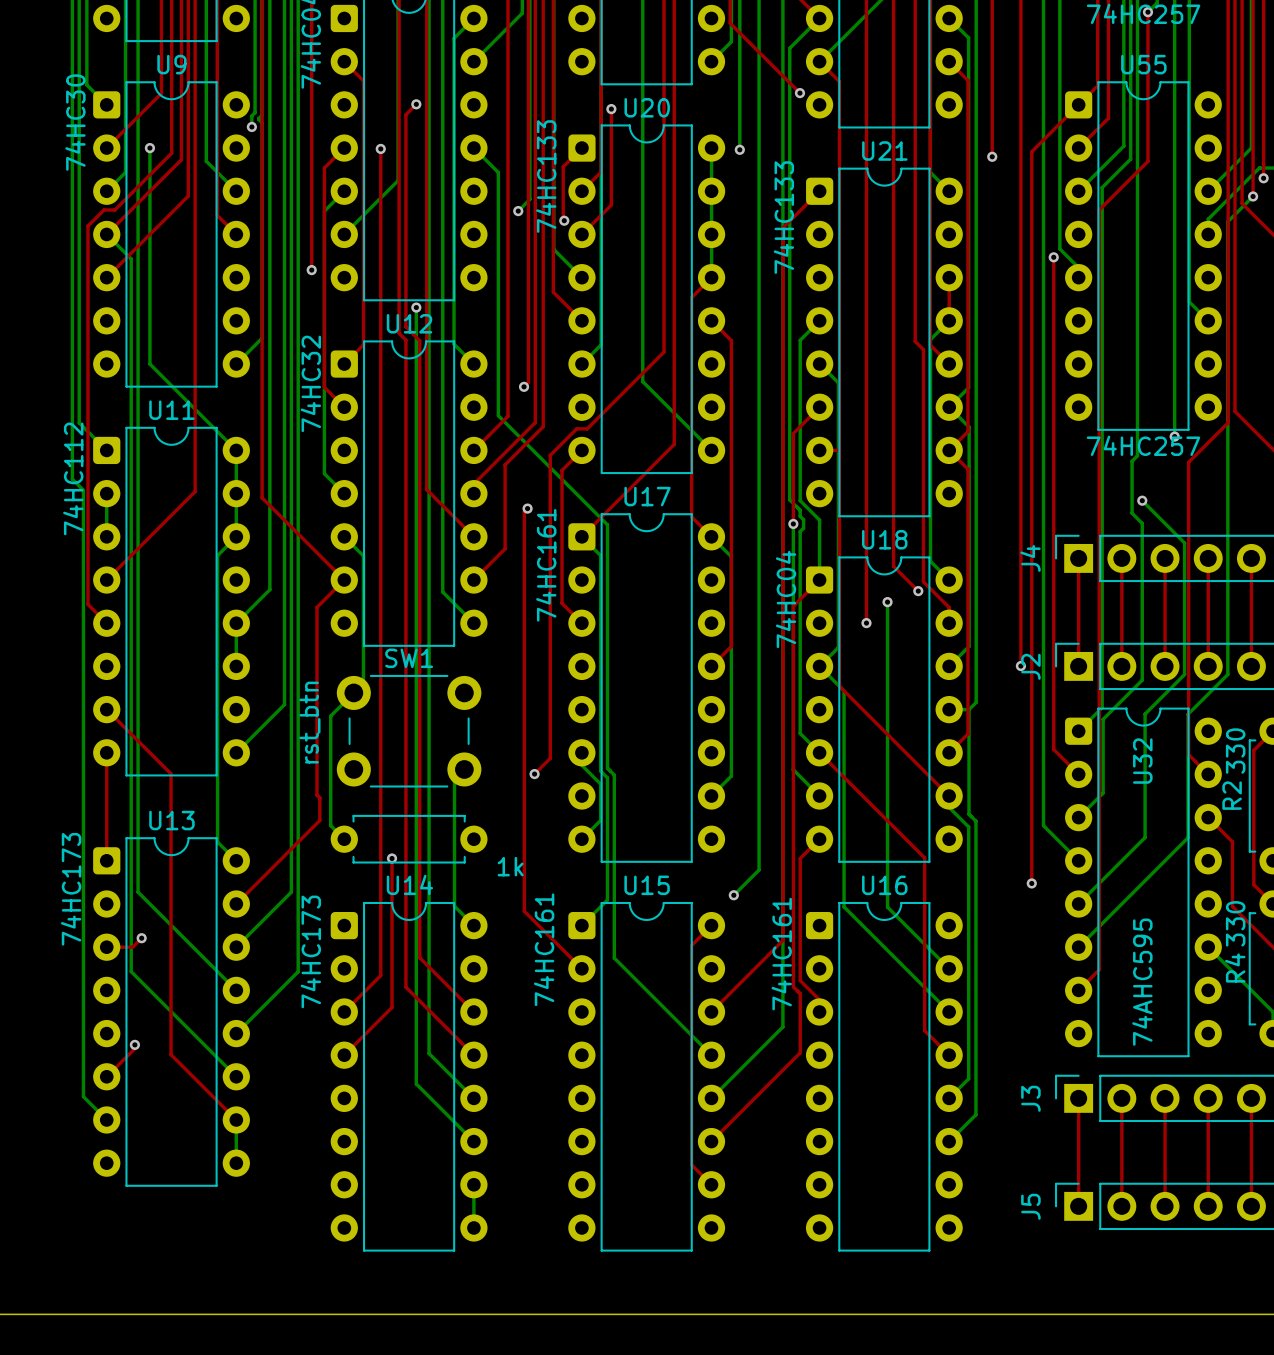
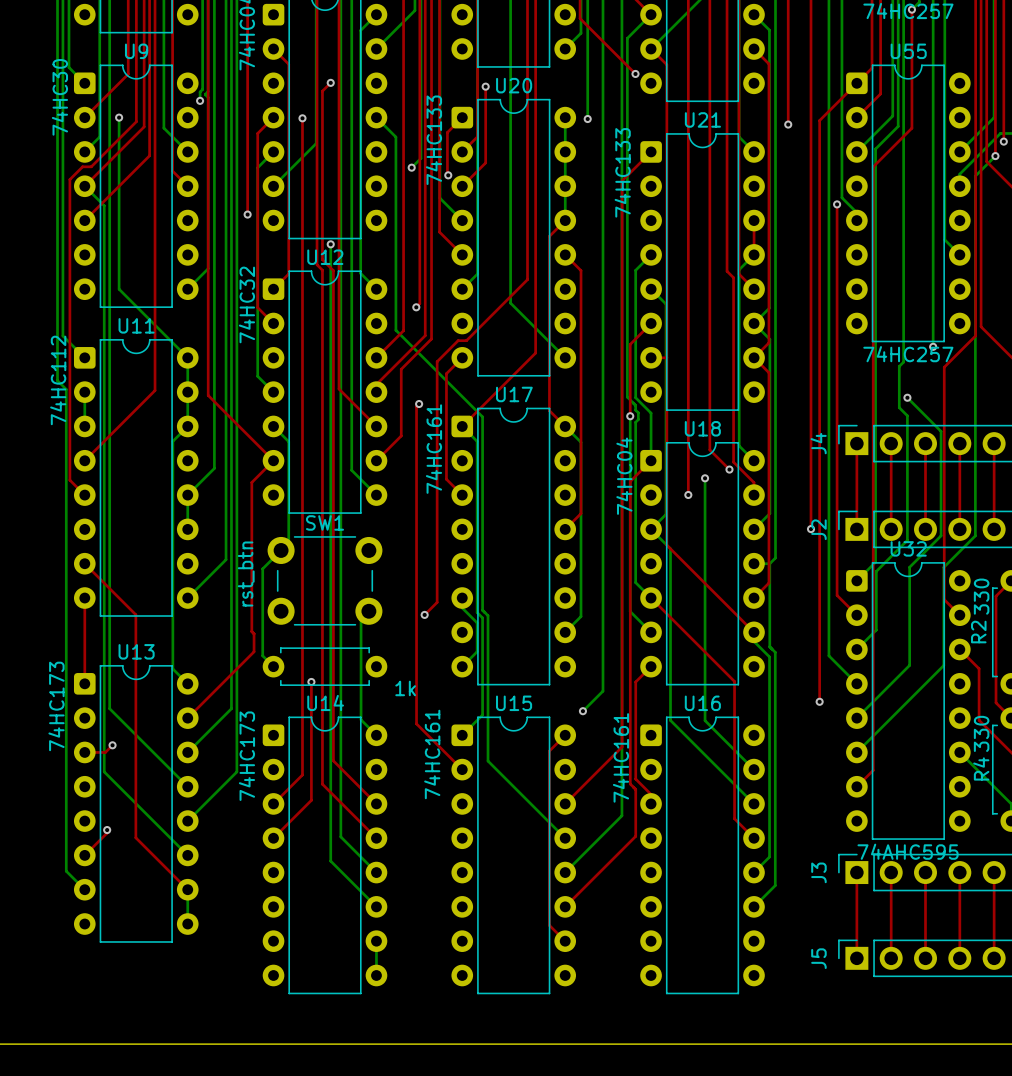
U32 name rotation: 0° (1142, 761) -> 90° clockwise (908, 548)
U32 name position: U32 (1142, 761) -> U32 (908, 548)
U32 value rotation: 0° (1142, 982) -> 90° clockwise (908, 851)

